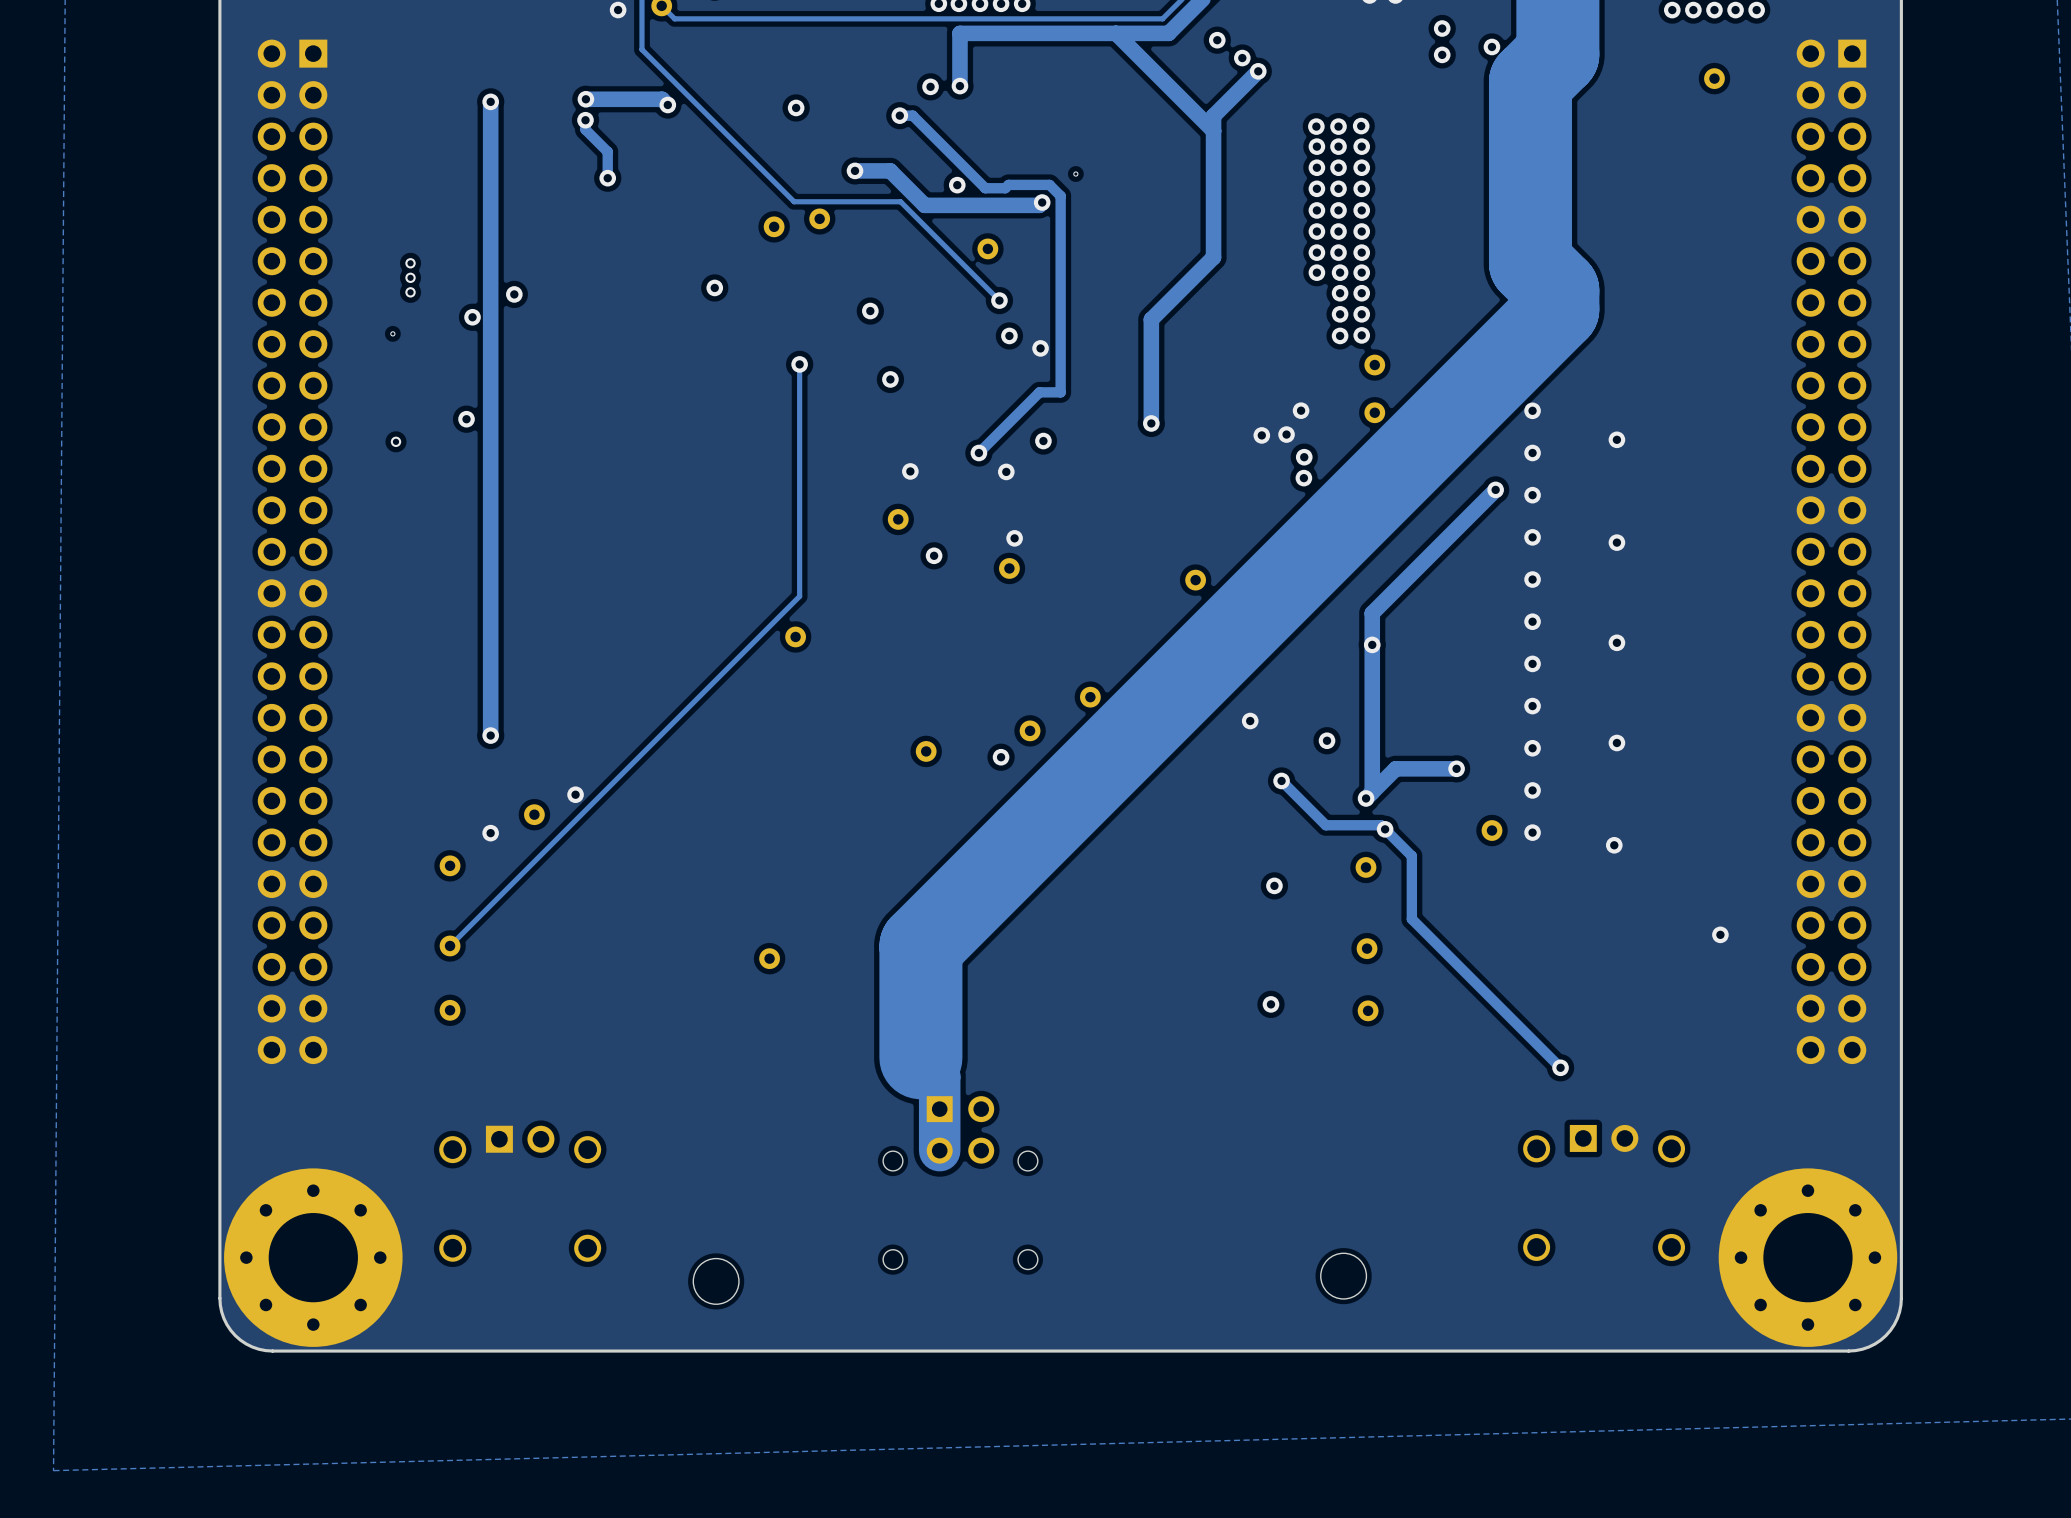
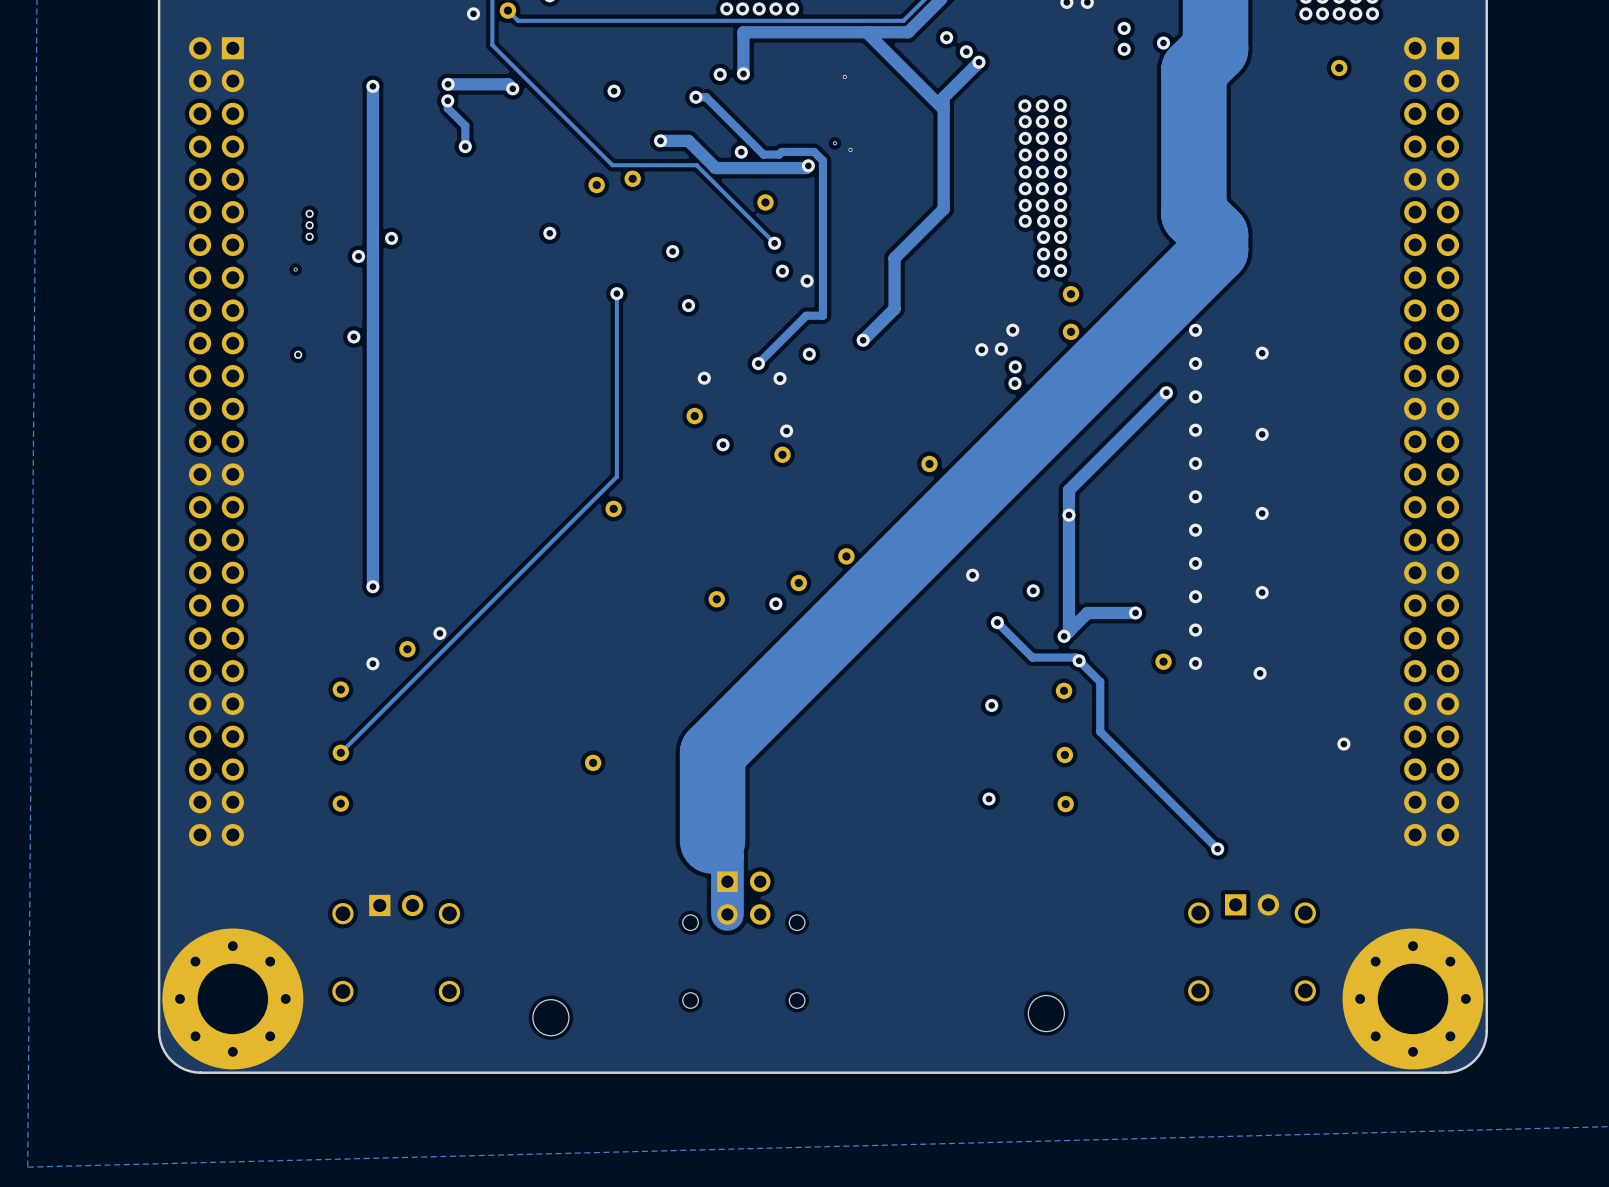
via: none -> (844, 76)
via: none -> (850, 149)
track: (1151, 383) (1151, 423) -> (894, 308) (863, 340)
via position: (1151, 423) -> (863, 340)

